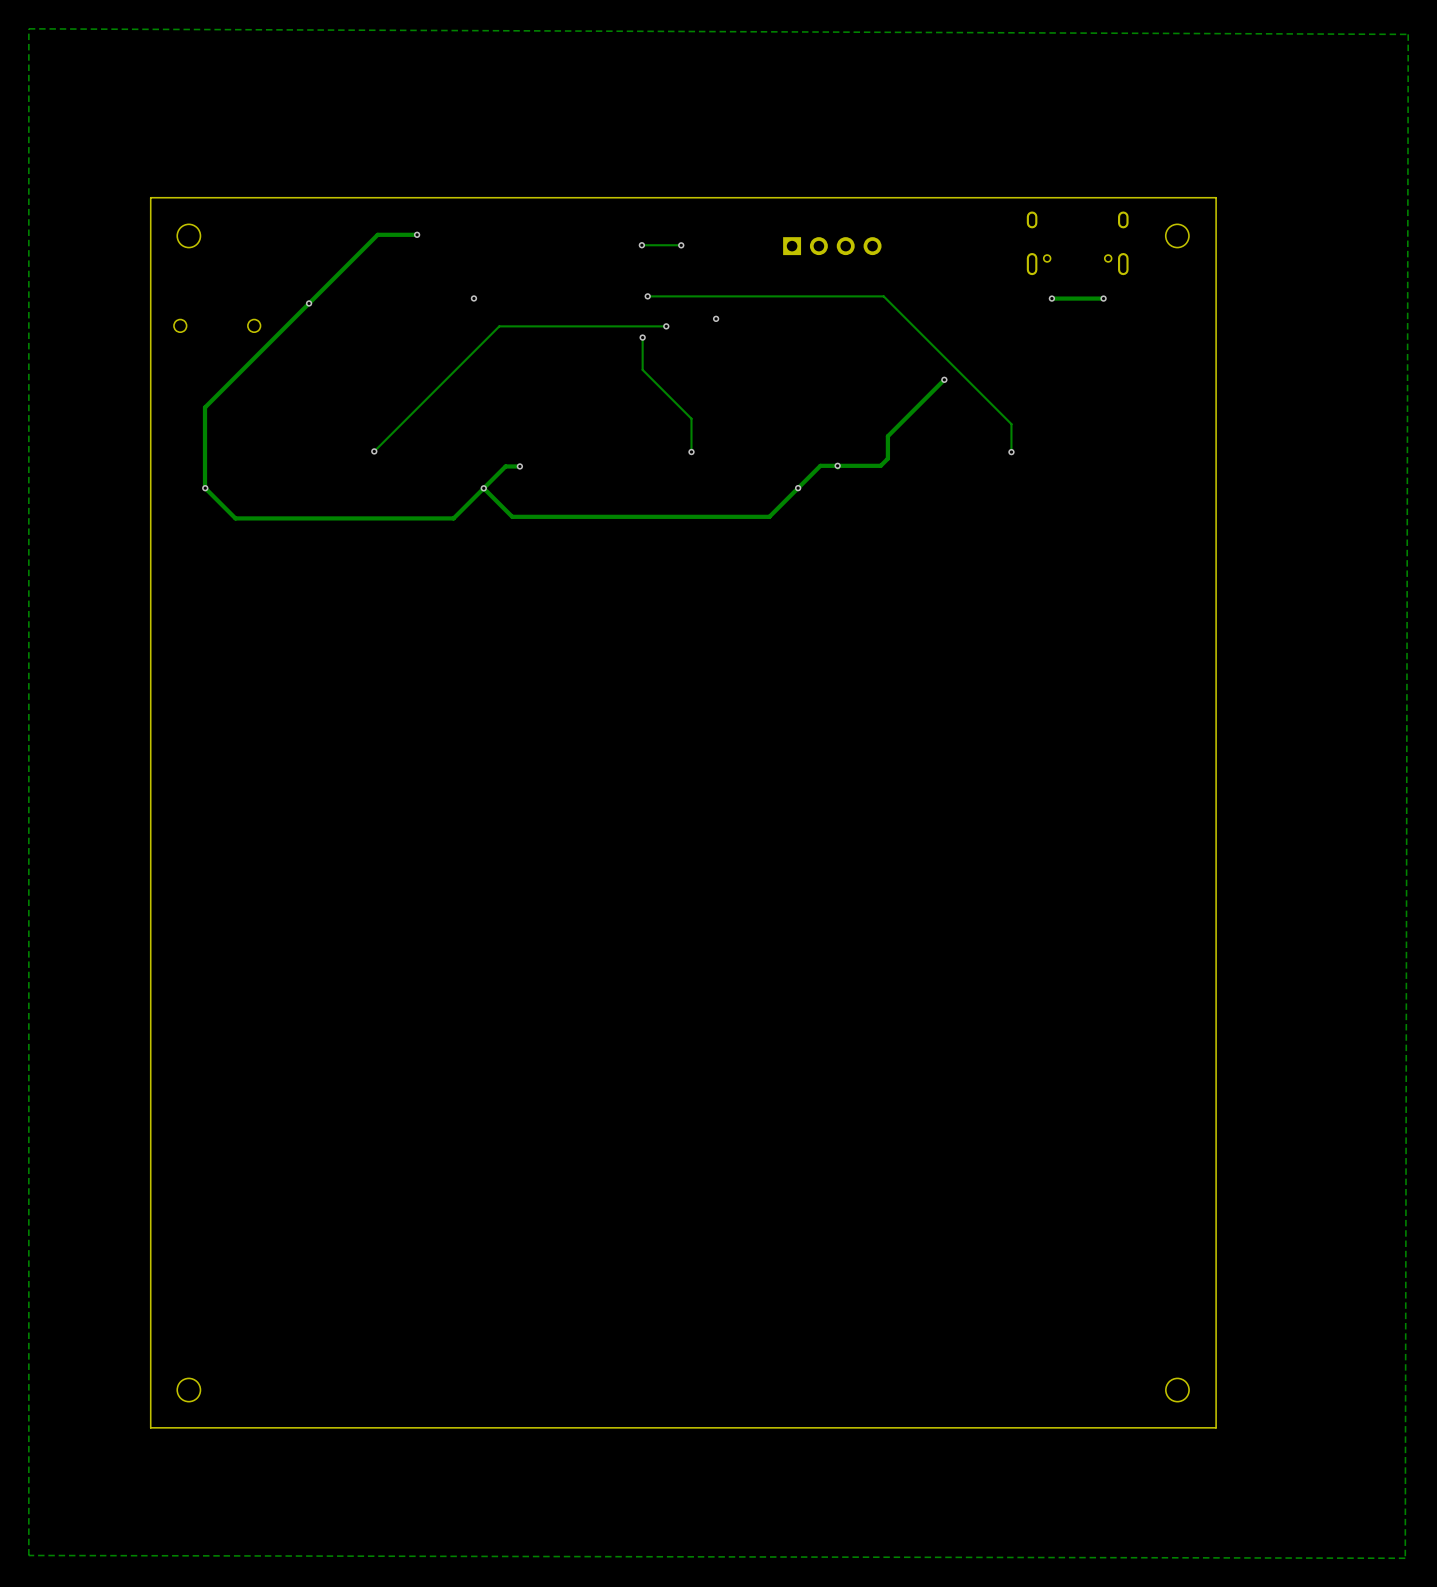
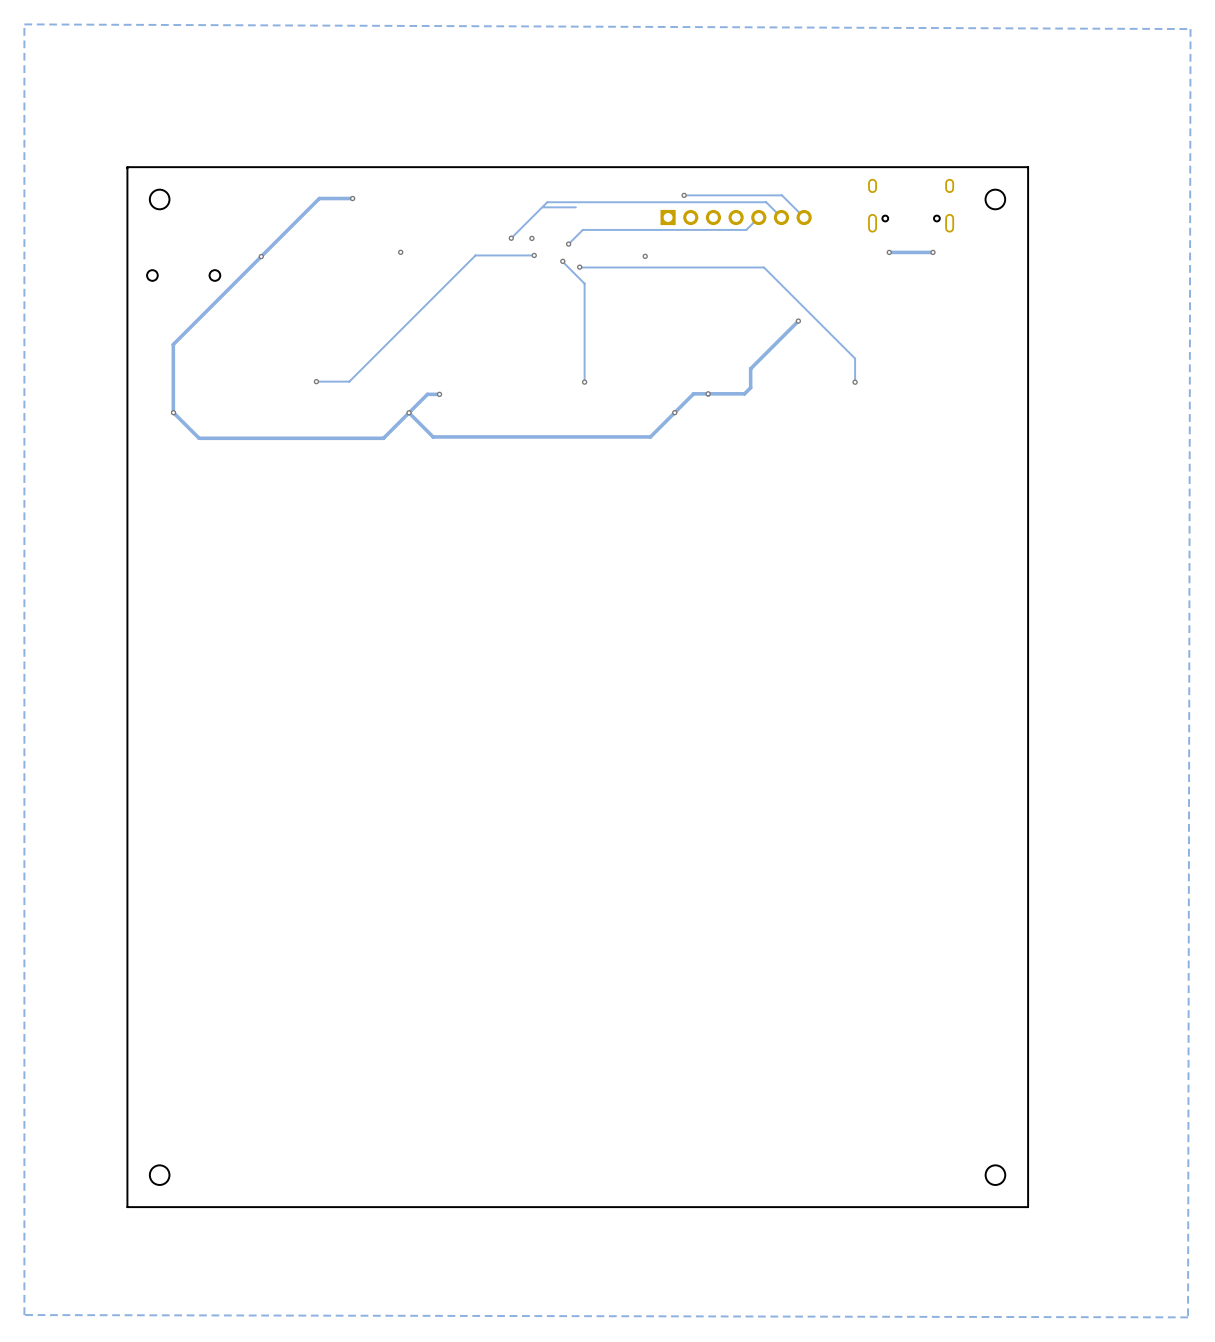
track: none -> (684, 195) (781, 195) (804, 217)
via: none -> (684, 195)
via: (641, 245) -> none
via: (681, 245) -> none
part: (832, 246) -> none
part: none -> (736, 217)
track: none -> (758, 217) (746, 229) (582, 229) (568, 244)
track: none -> (781, 217) (766, 202) (547, 202) (511, 238)
via: none -> (511, 238)
via: none -> (531, 238)
via: none -> (568, 244)
track: (647, 296) (883, 296) (903, 316) -> (579, 267) (764, 267)
via: (647, 296) -> none
via: none -> (534, 255)
via: none -> (645, 256)
via: none -> (562, 261)
via: none -> (579, 267)
via: (716, 318) -> none
track: (666, 326) (499, 326) (374, 451) -> (534, 255) (475, 255) (349, 381) (316, 381)
via: (666, 326) -> none
track: (642, 337) (642, 369) (691, 418) -> (562, 261) (584, 283) (584, 354)
via: (642, 337) -> none

